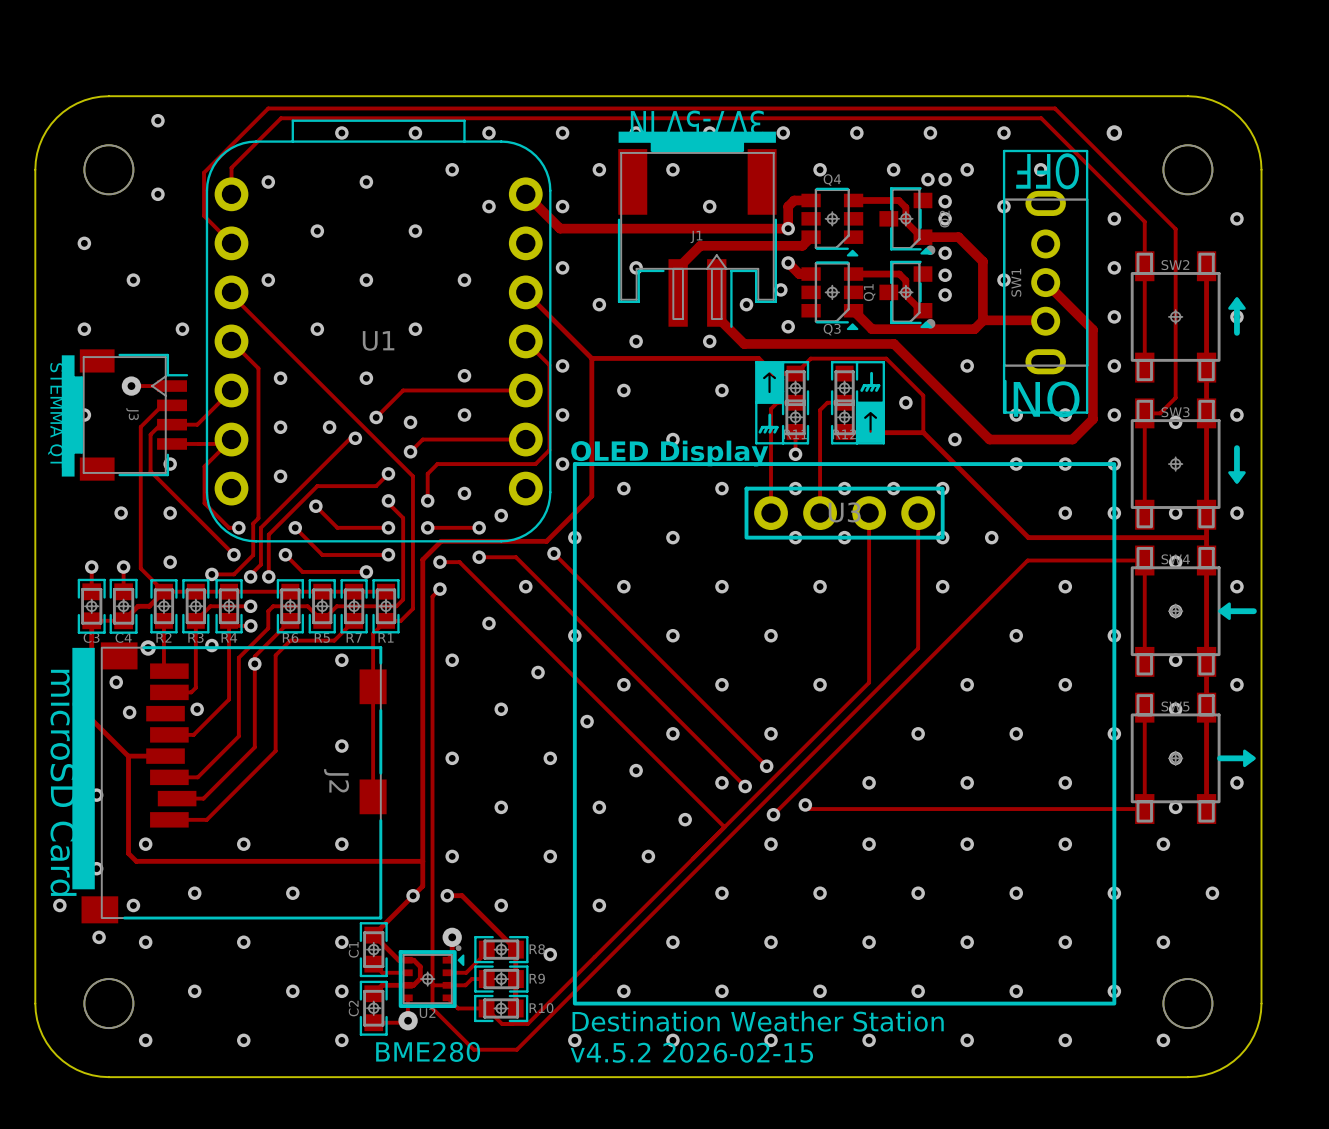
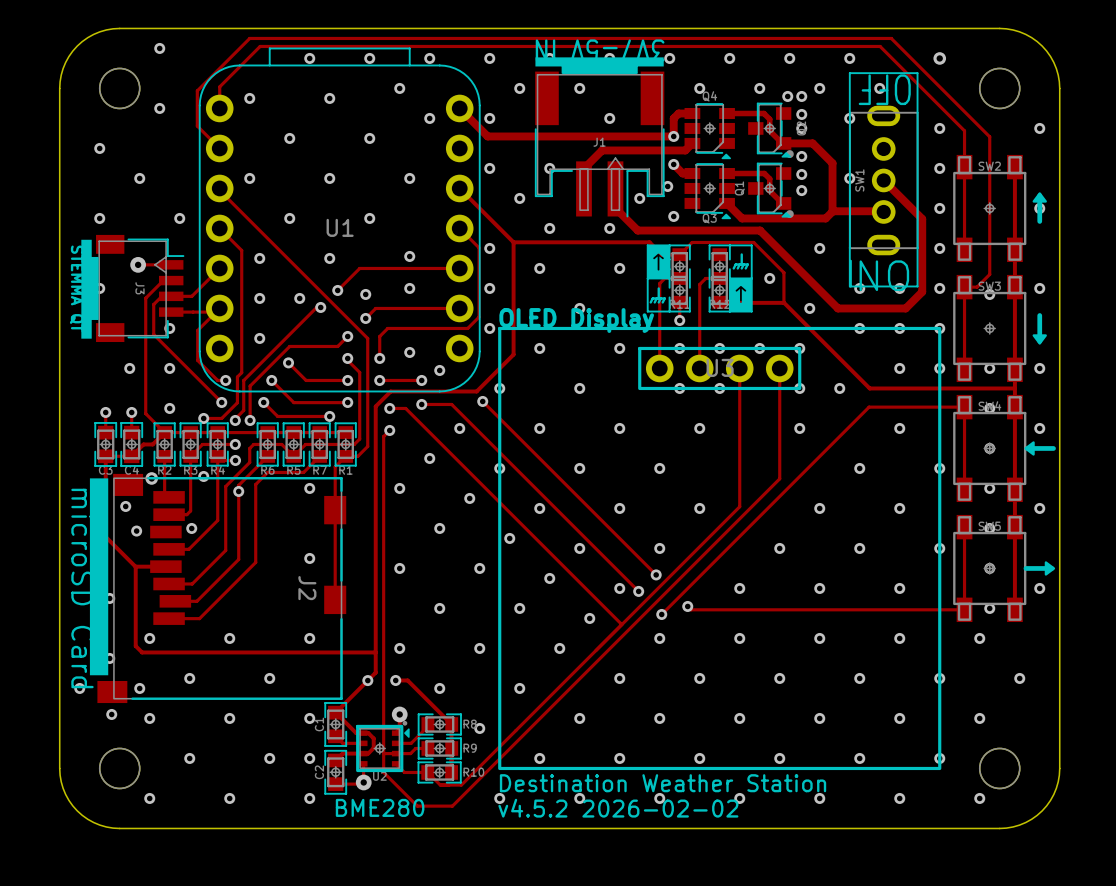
text: v4.5.2 2026-02-15 (691, 1052) -> v4.5.2 2026-02-02 (618, 808)

